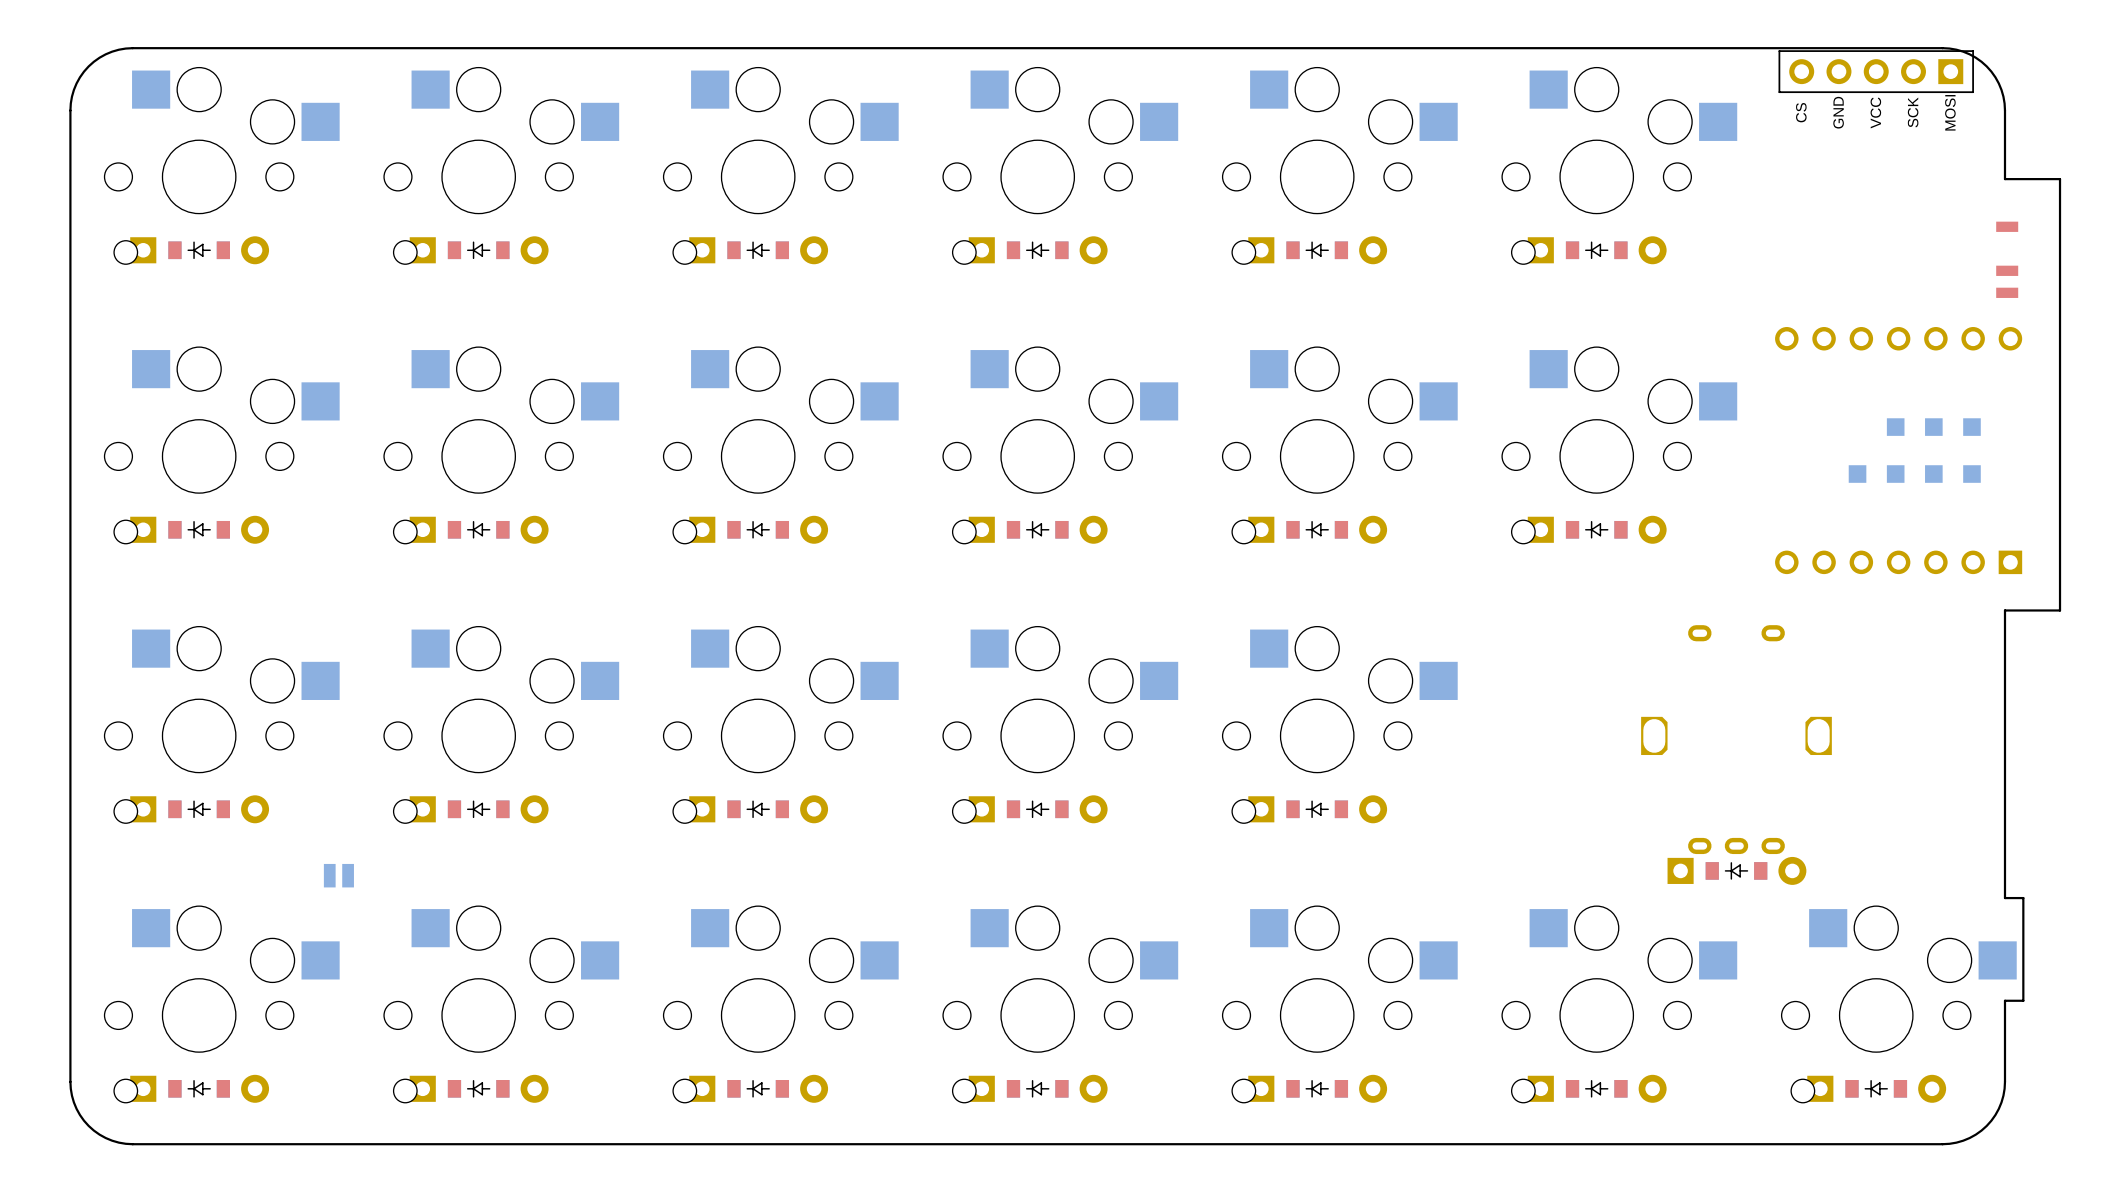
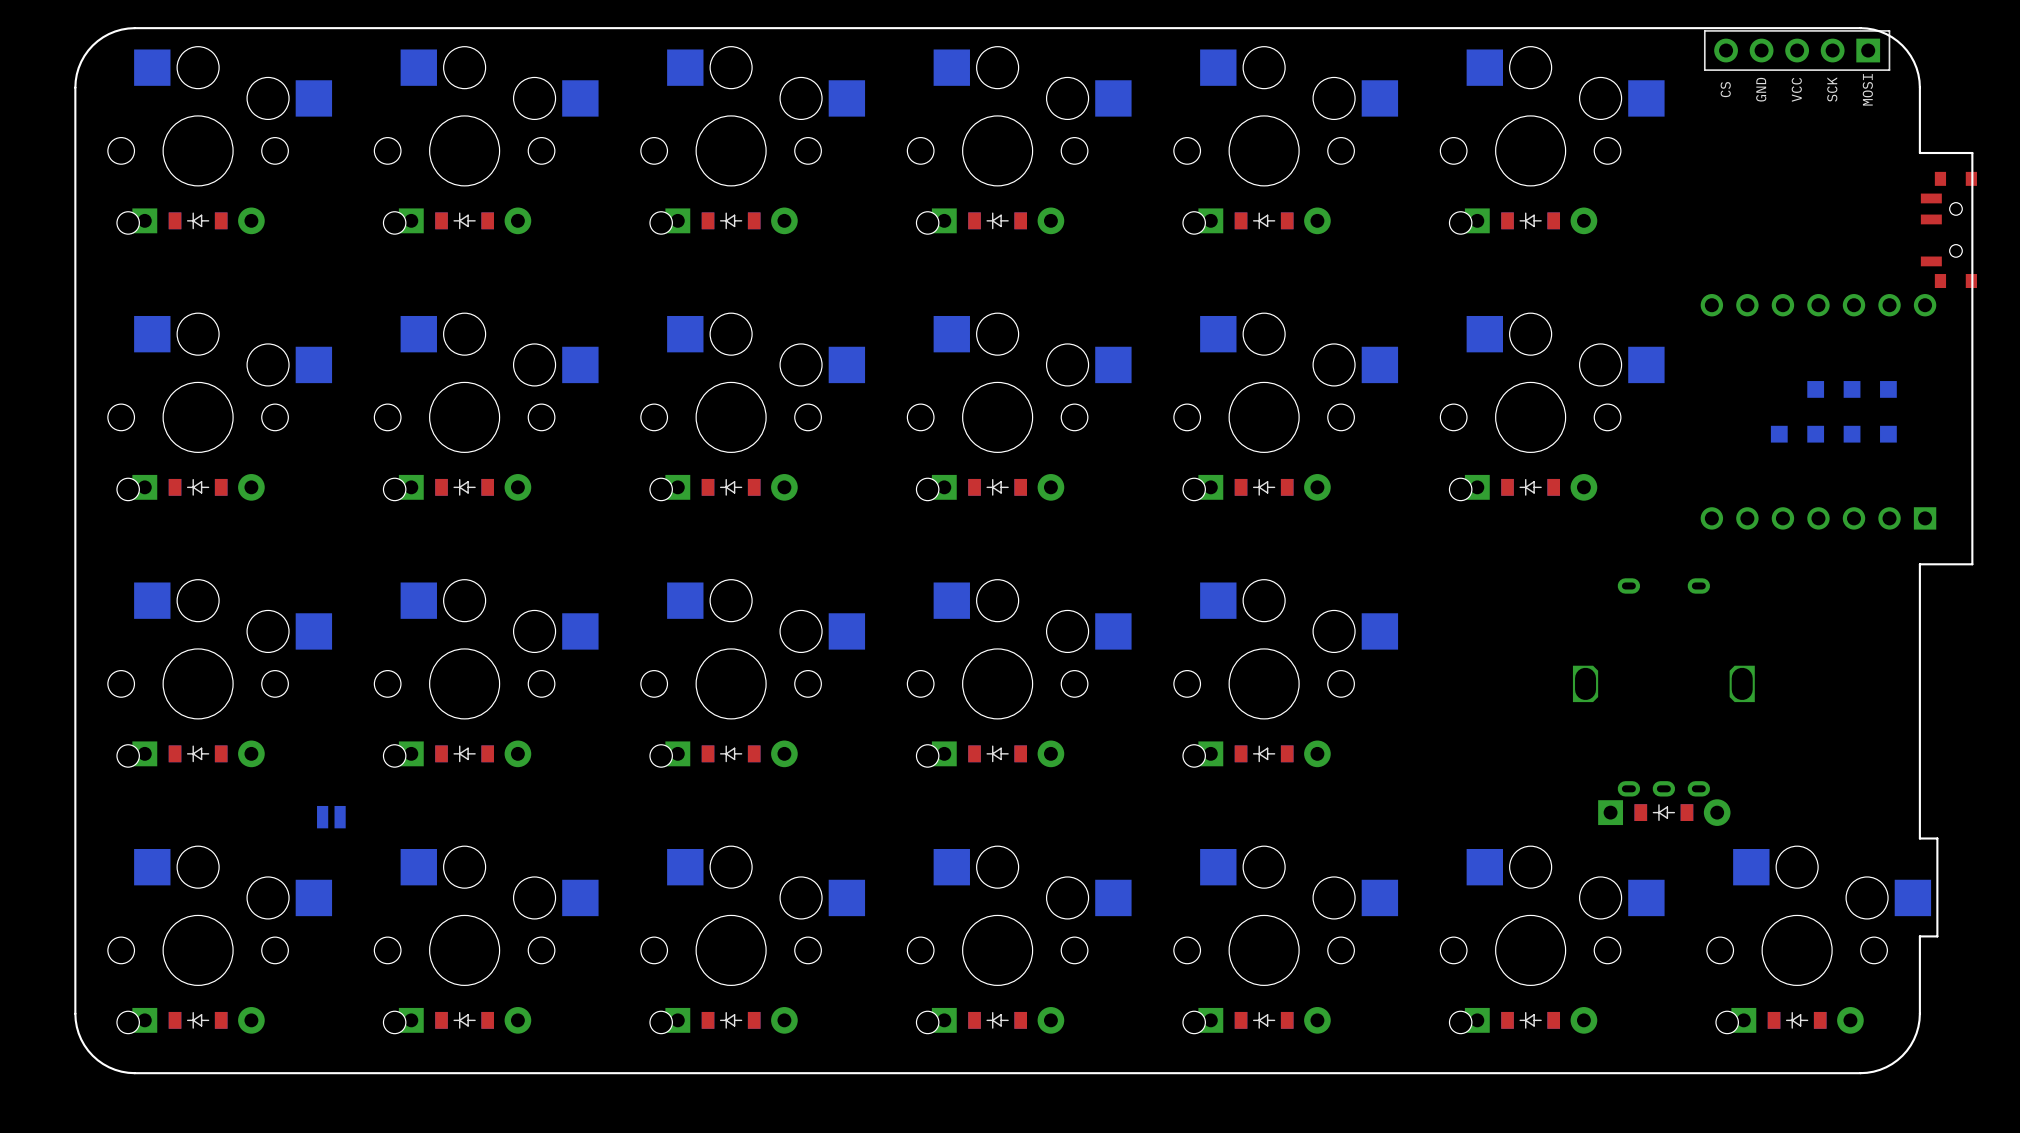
part: (2007, 259) -> none
part: none -> (1948, 229)

